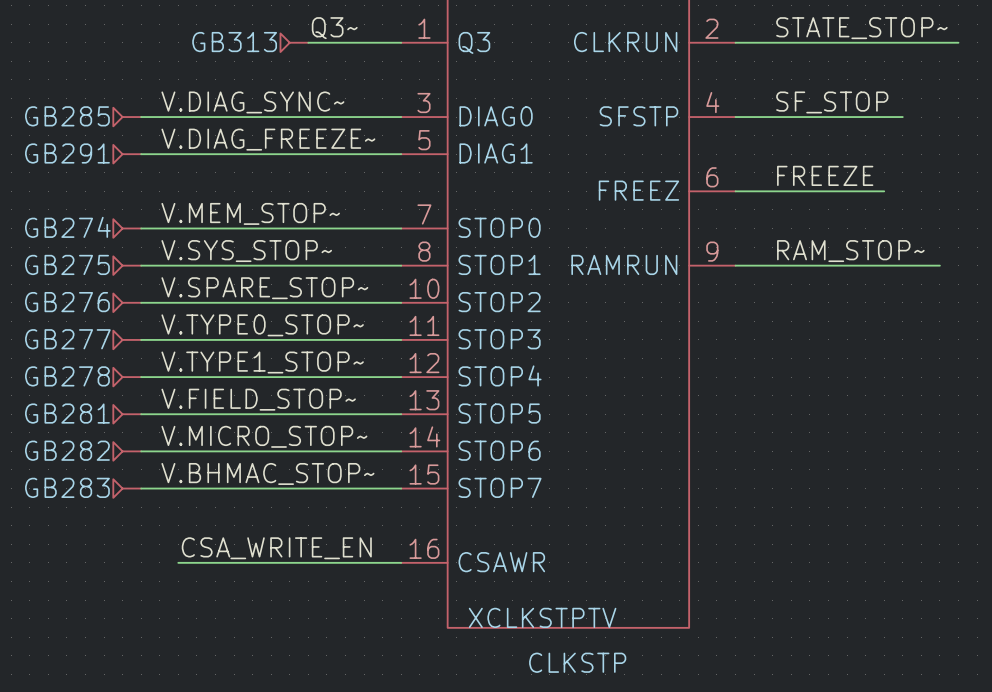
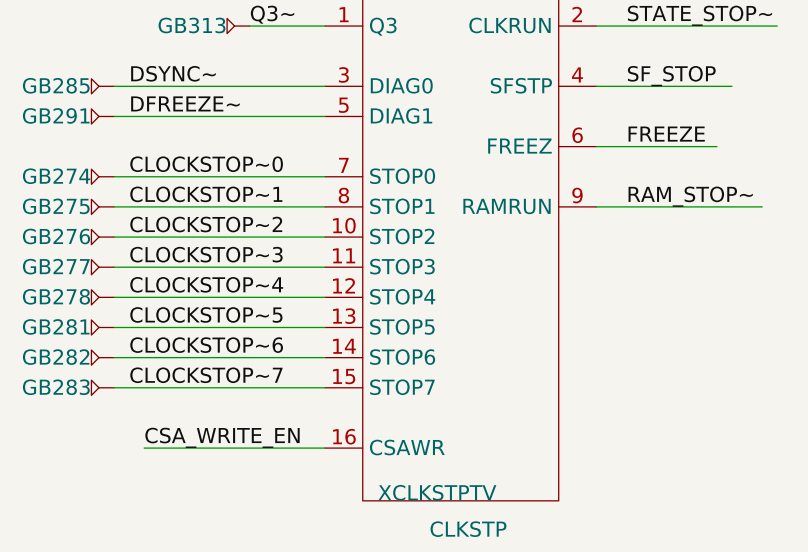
label: V.DIAG_SYNC~ (252, 102) -> DSYNC~ (173, 73)
label: V.DIAG_FREEZE~ (268, 139) -> DFREEZE~ (185, 103)
label: V.MEM_STOP~ (250, 213) -> CLOCKSTOP~0 (206, 164)
label: V.SYS_STOP~ (246, 251) -> CLOCKSTOP~1 (206, 194)
label: V.SPARE_STOP~ (264, 288) -> CLOCKSTOP~2 (206, 224)
label: V.TYPE0_STOP~ (262, 325) -> CLOCKSTOP~3 (206, 254)
label: V.TYPE1_STOP~ (262, 362) -> CLOCKSTOP~4 (206, 284)
label: V.FIELD_STOP~ (258, 399) -> CLOCKSTOP~5 (206, 314)
label: V.MICRO_STOP~ (264, 436) -> CLOCKSTOP~6 (206, 345)
label: V.BHMAC_STOP~ (267, 473) -> CLOCKSTOP~7 (206, 375)

